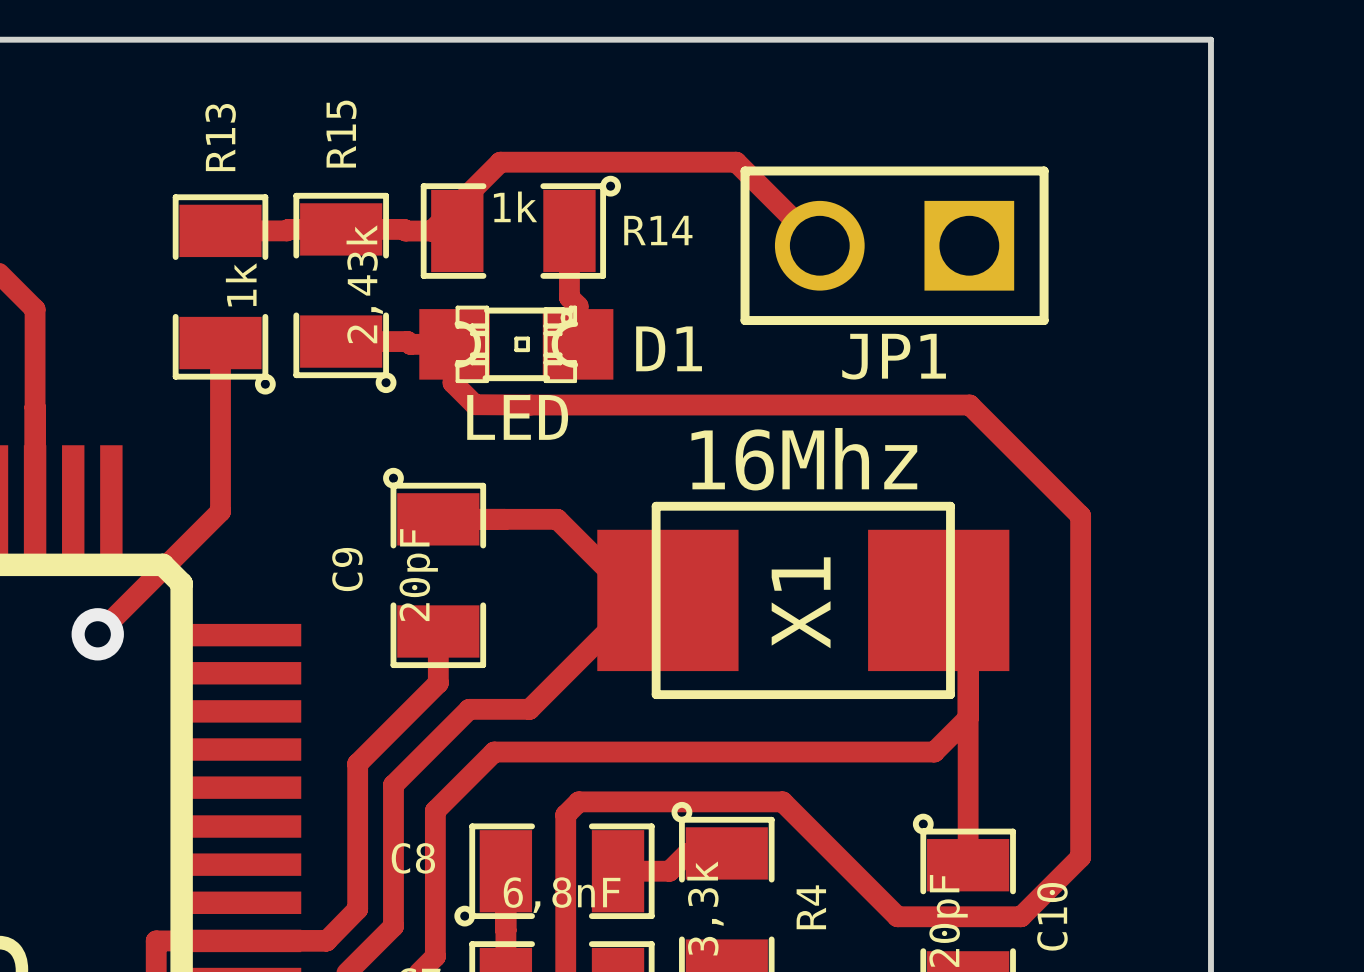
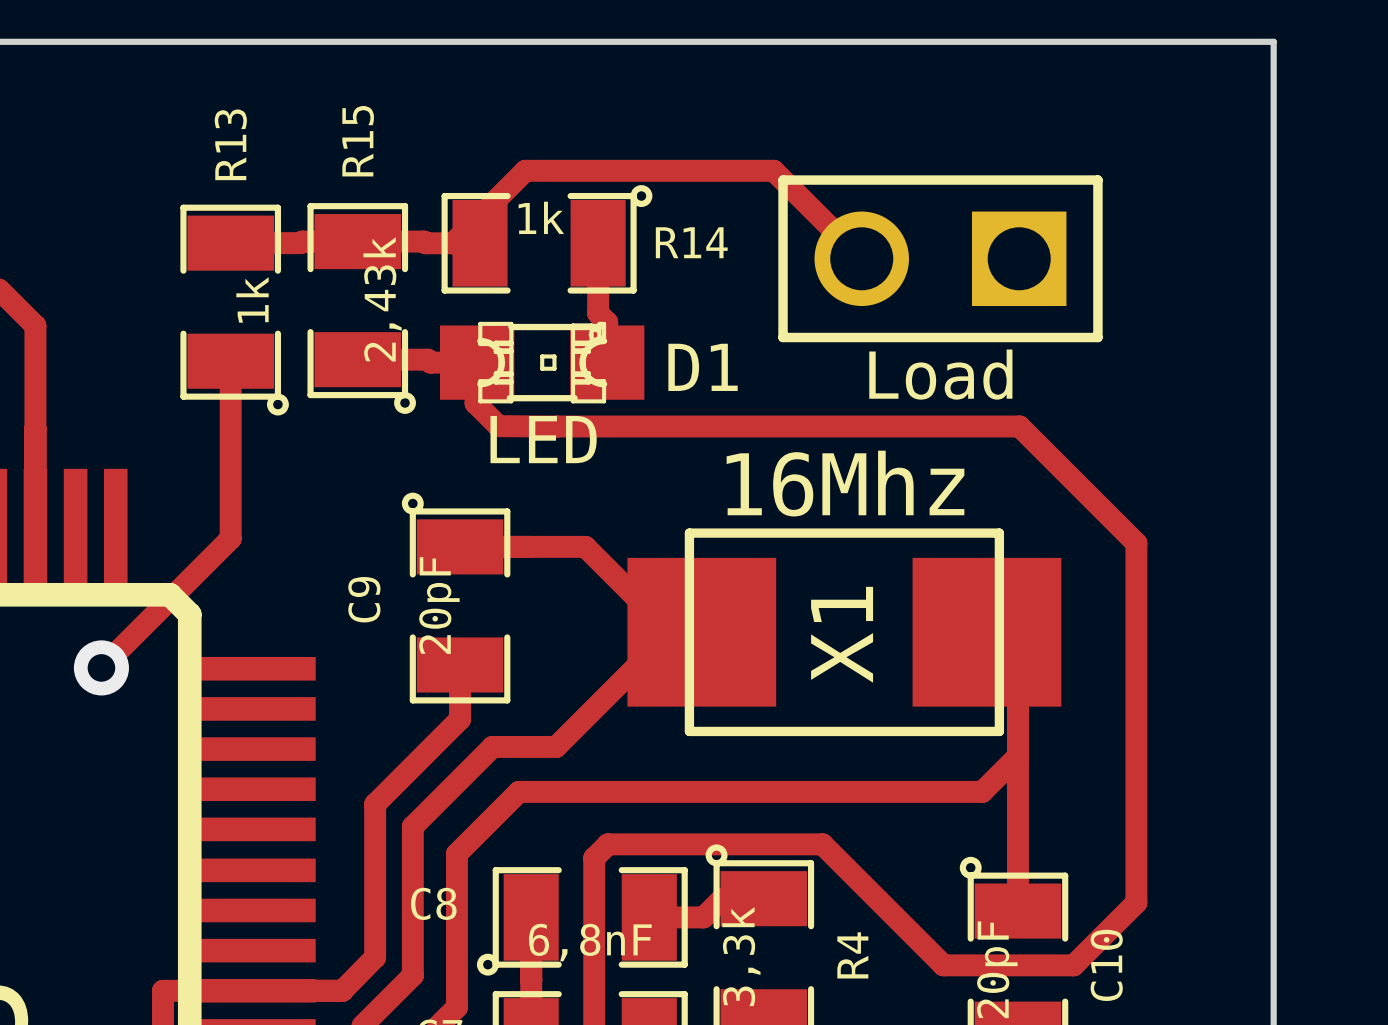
JP1 name: JP1 (894, 356) -> Load (940, 374)

